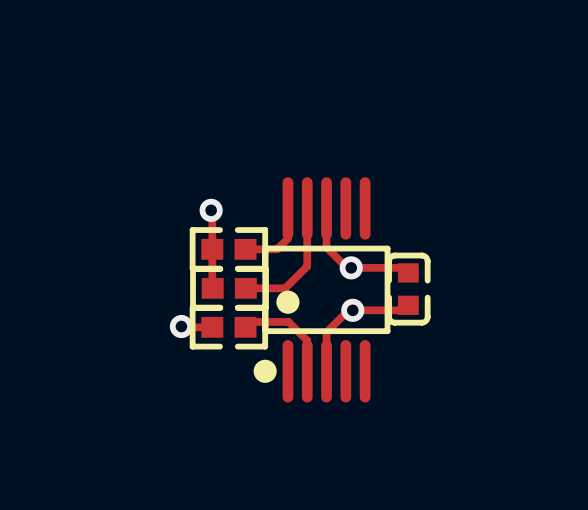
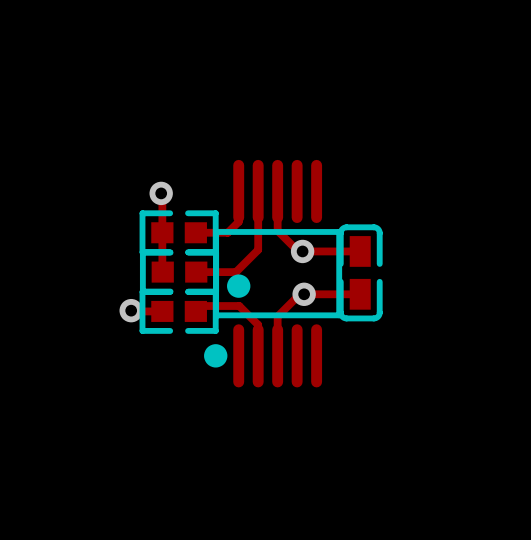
part footprint: [386, 252, 431, 326] -> [337, 224, 383, 322]

